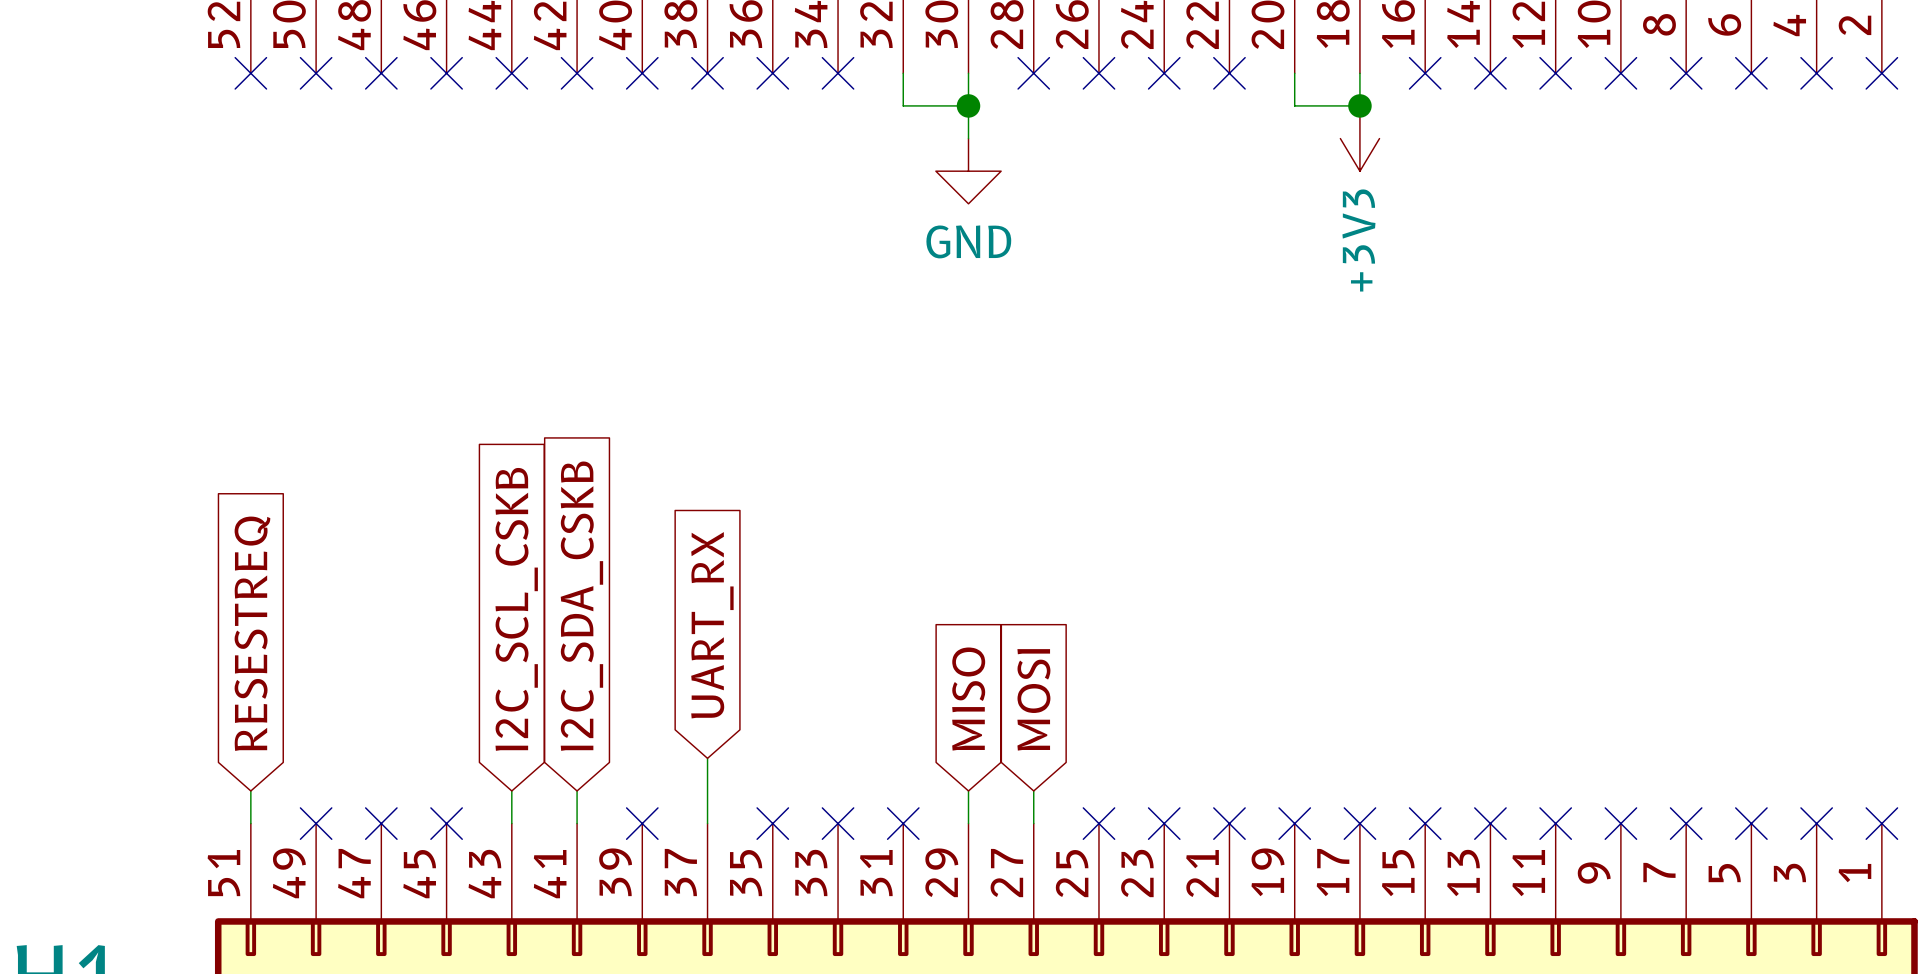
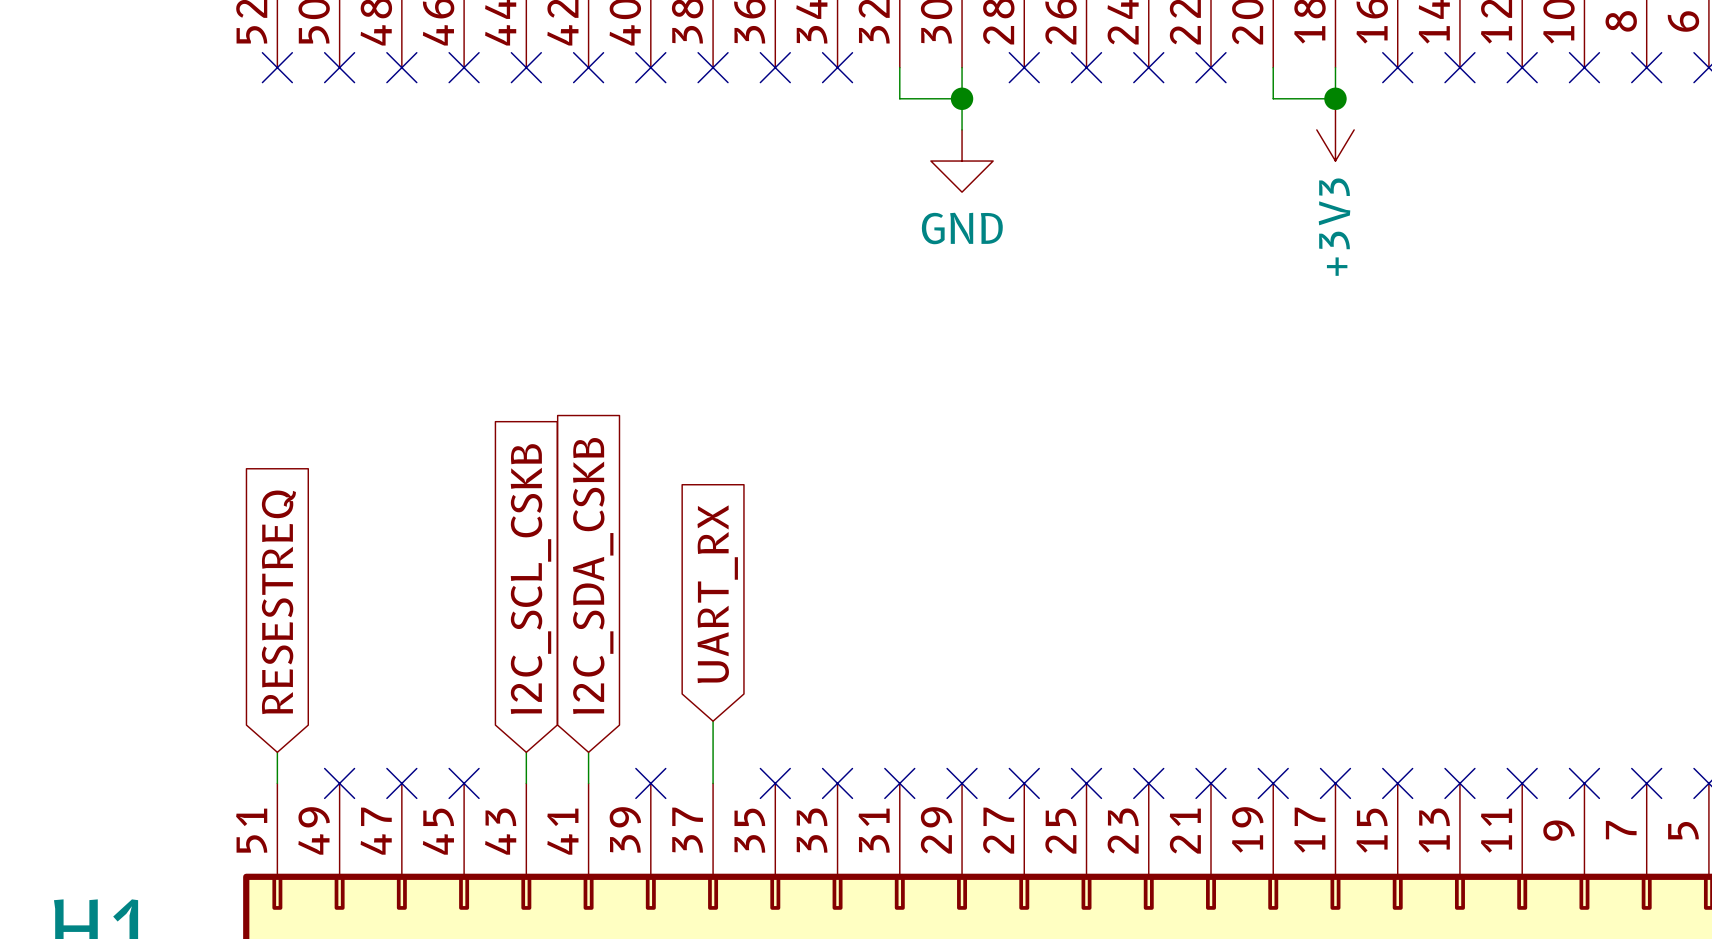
global label: MISO (968, 699) -> none
global label: MOSI (1033, 699) -> none
wire: (968, 790) (968, 823) -> none
wire: (1033, 790) (1033, 823) -> none
no-connect mark: none -> (962, 783)
no-connect mark: none -> (1024, 783)

